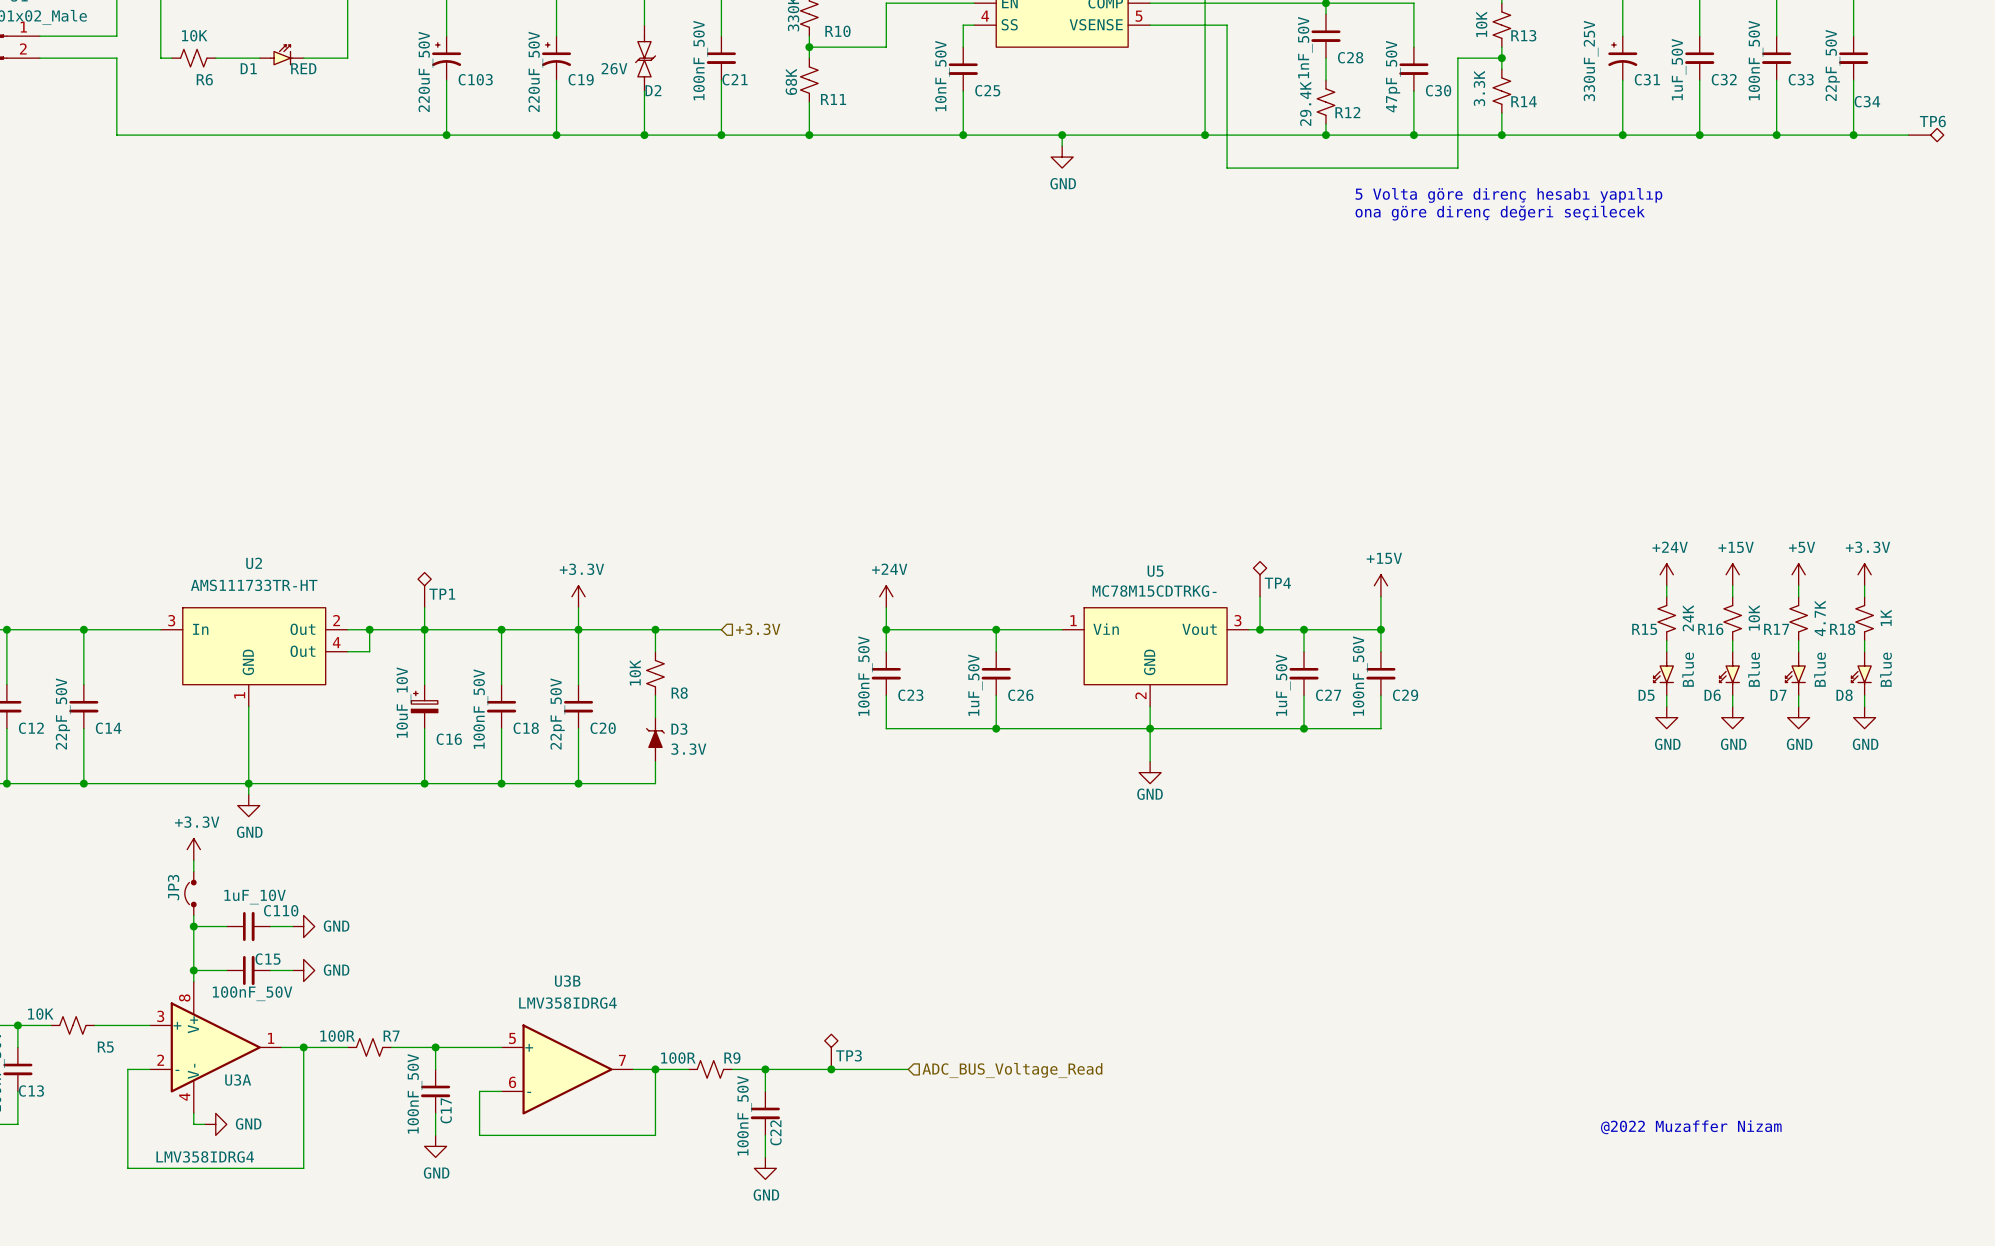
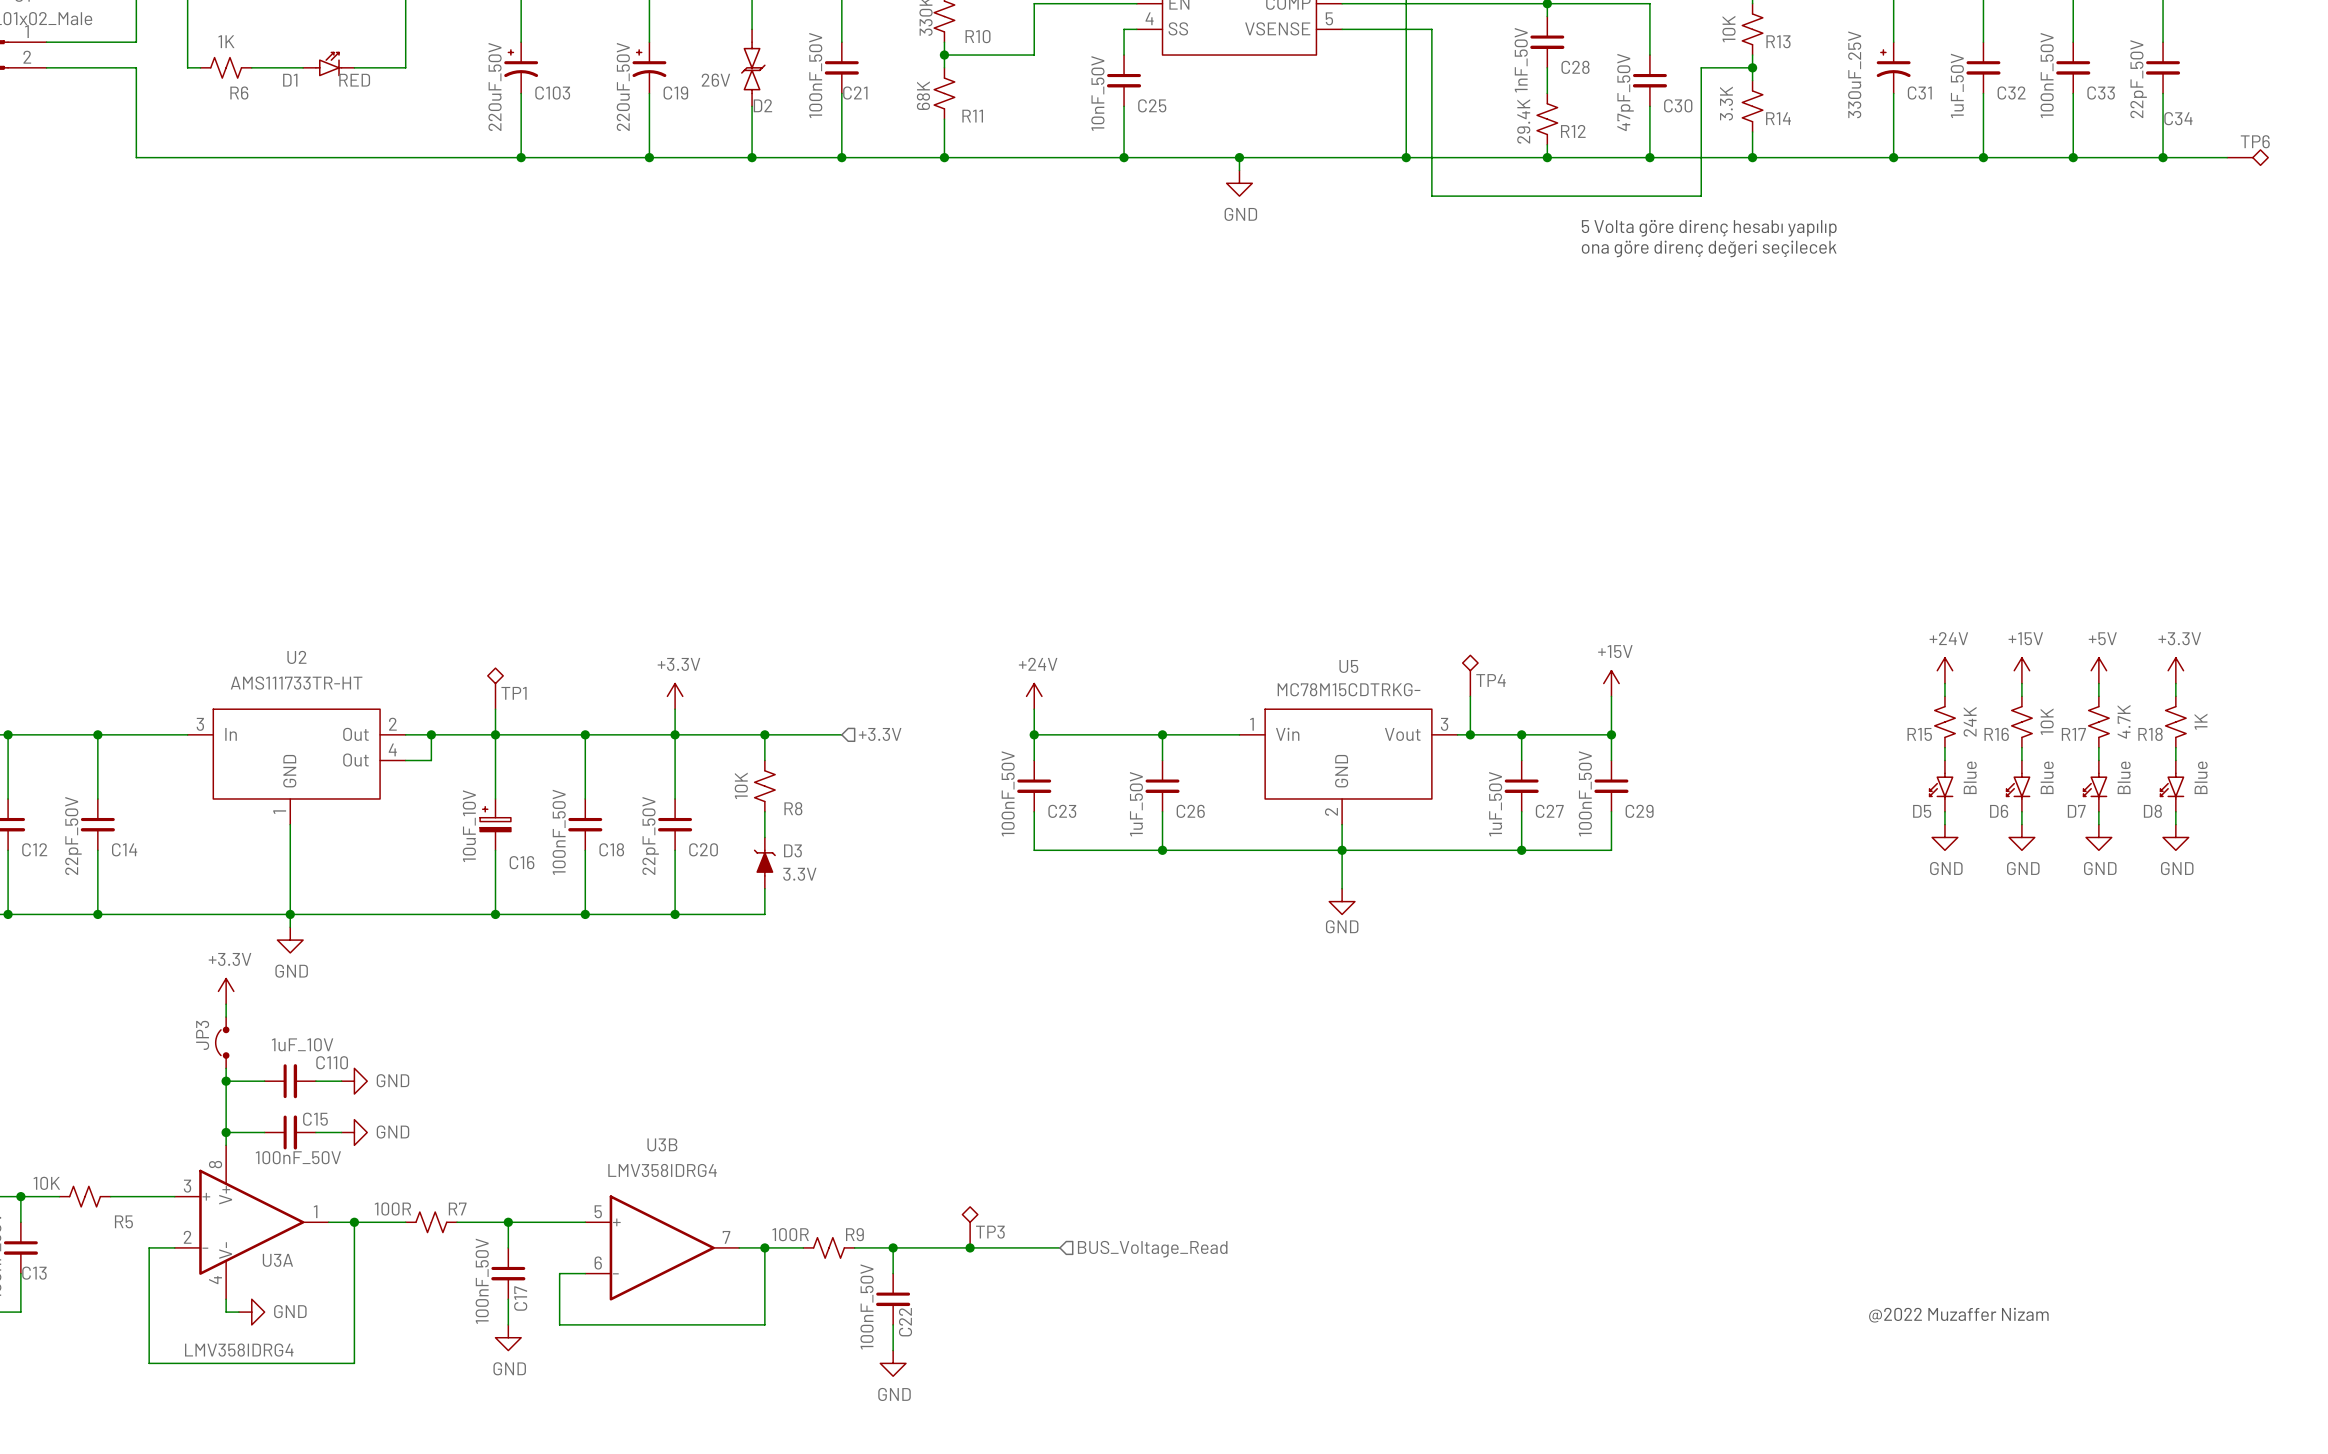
R6 value: 10K (194, 35) -> 1K (226, 41)
hierarchical label: ADC_BUS_Voltage_Read (1012, 1070) -> BUS_Voltage_Read (1152, 1249)

